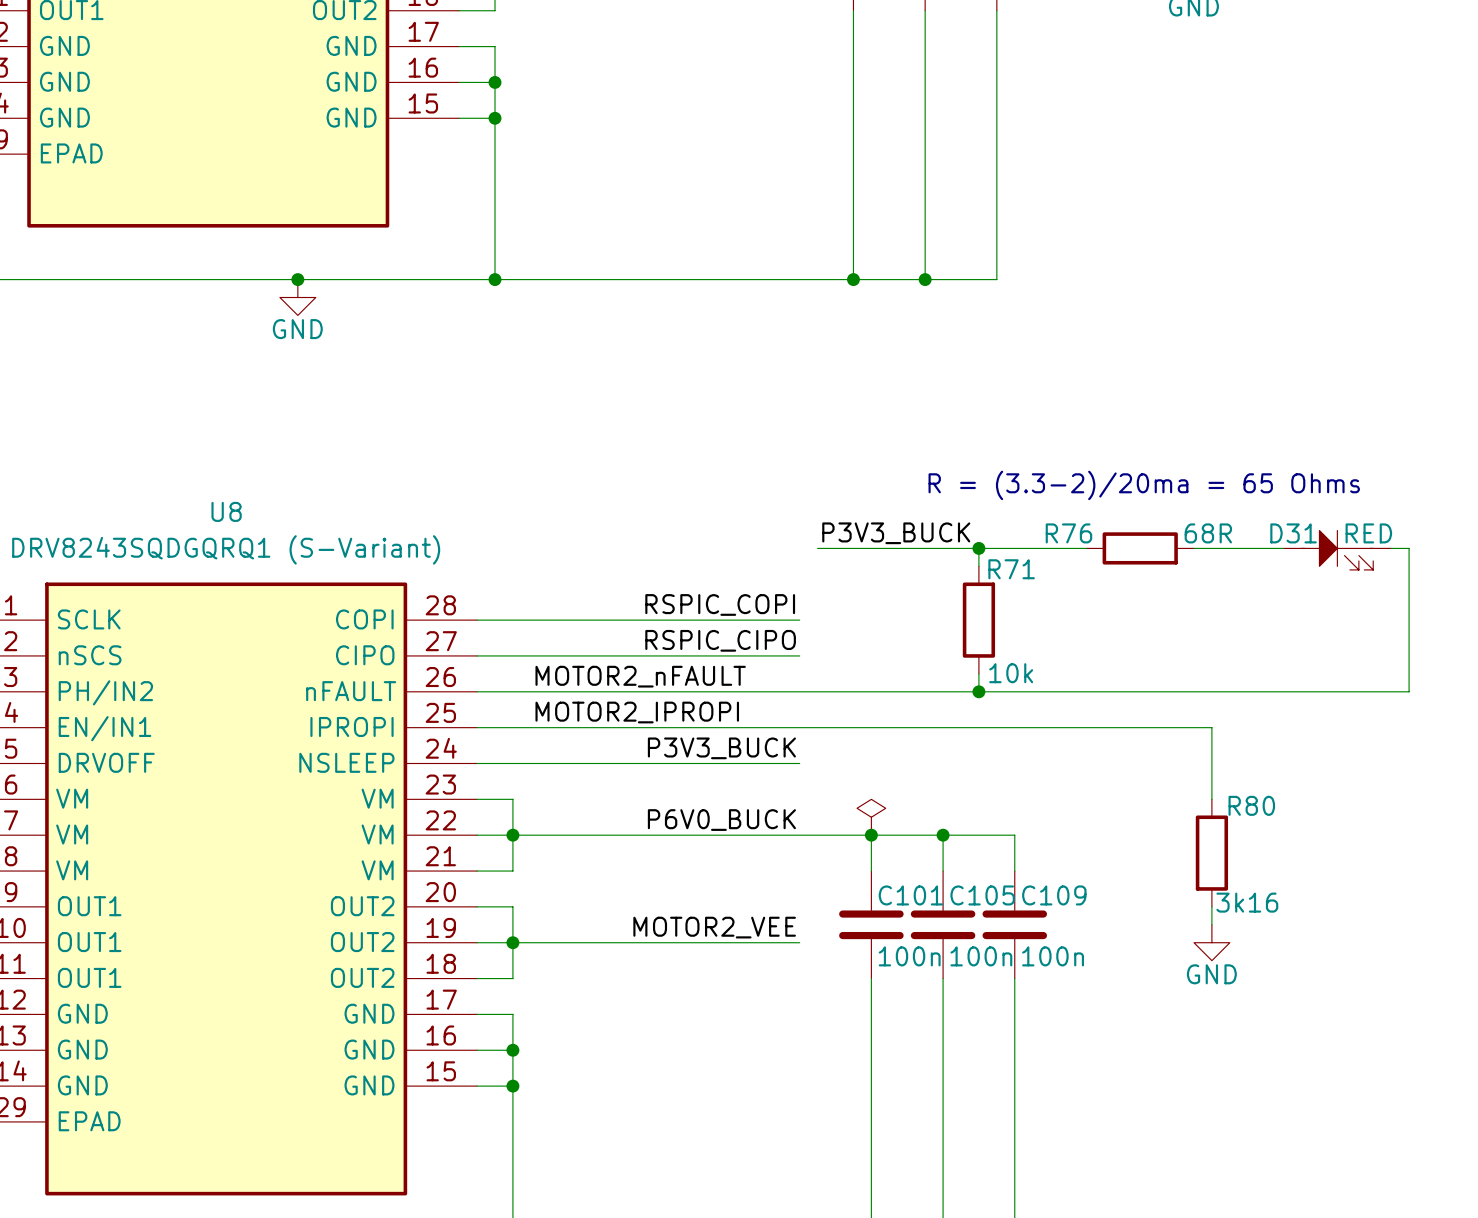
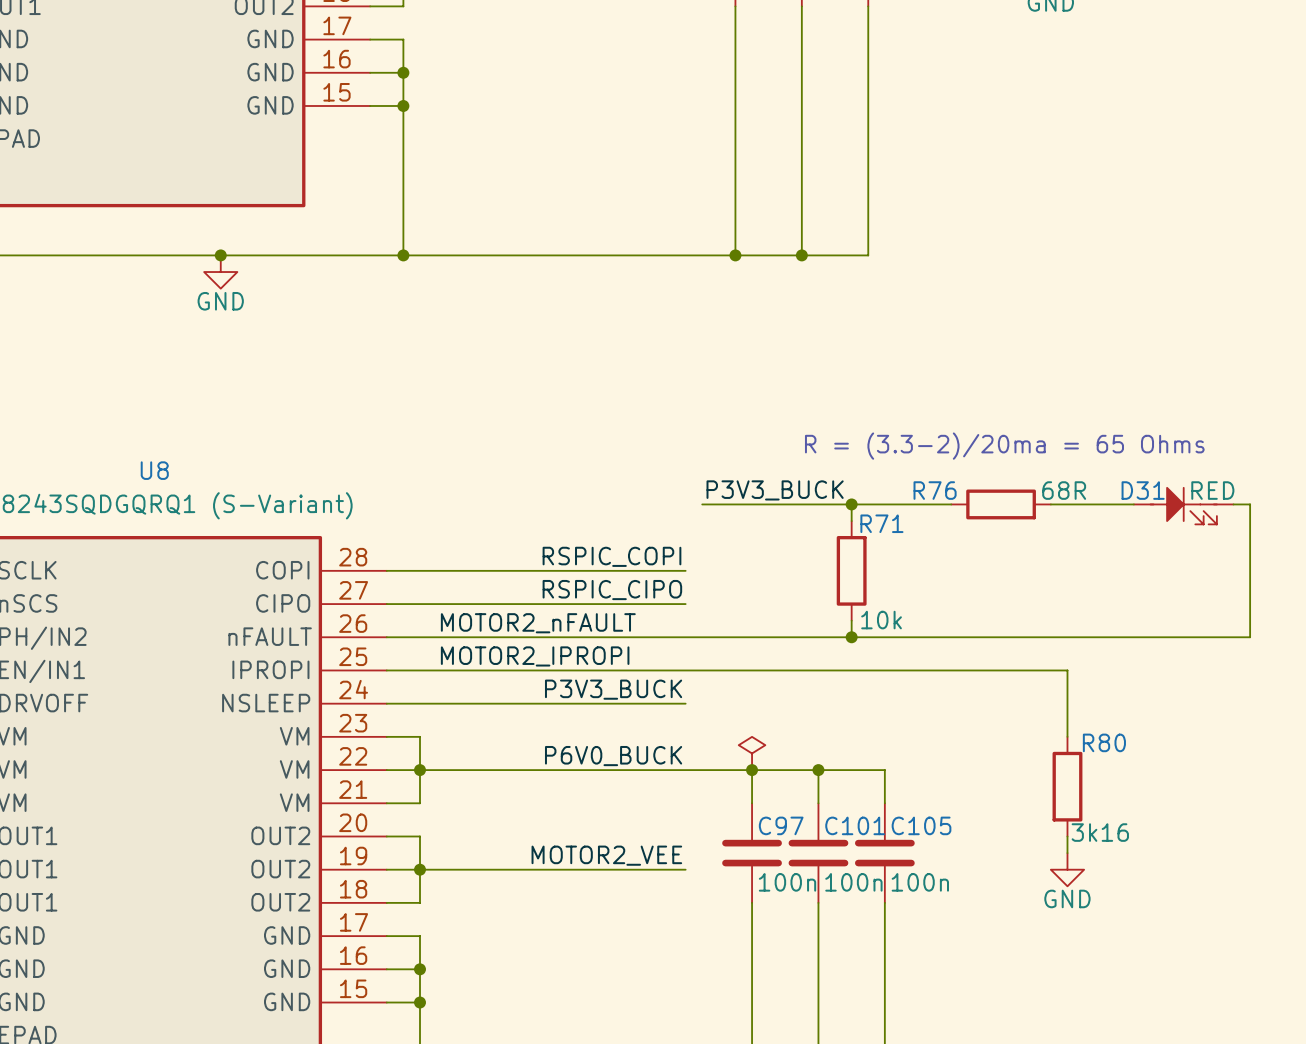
C101 name: C101 (910, 895) -> C97 (781, 825)
C105 name: C105 (982, 895) -> C101 (855, 825)
C109 name: C109 (1054, 895) -> C105 (921, 825)

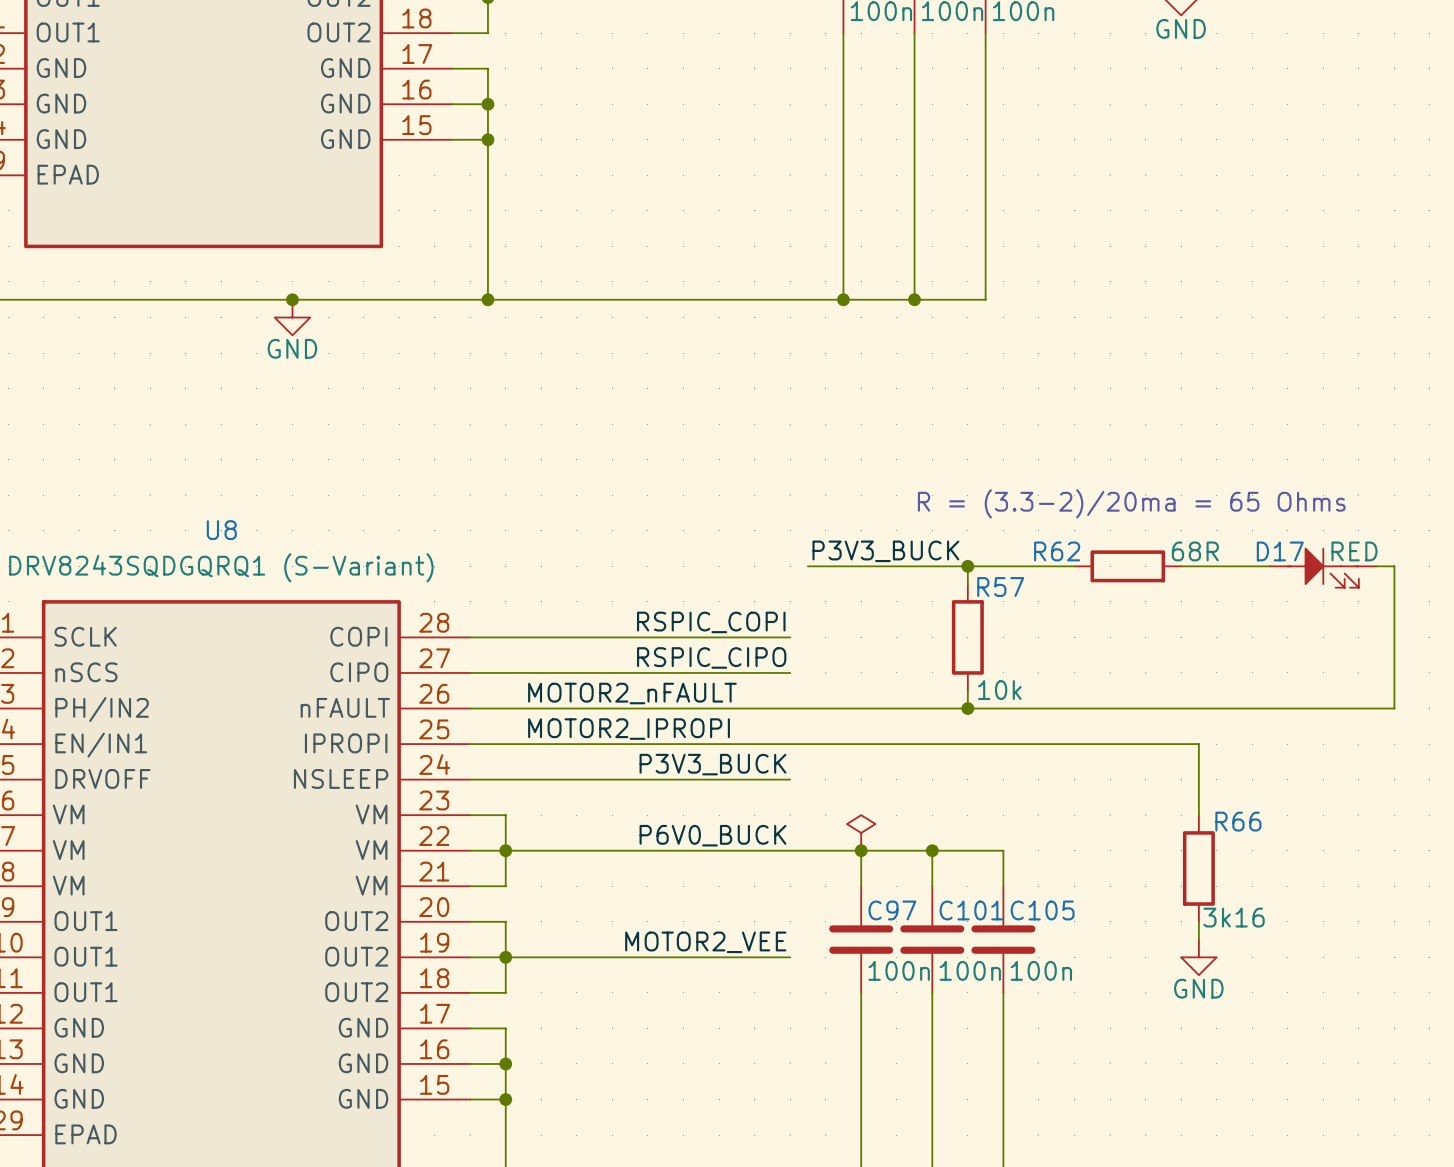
R76 name: R76 (935, 490) -> R62 (1057, 551)
D31 name: D31 (1143, 490) -> D17 (1280, 551)
R71 name: R71 (881, 523) -> R57 (1000, 587)
R80 name: R80 (1104, 742) -> R66 (1238, 821)

